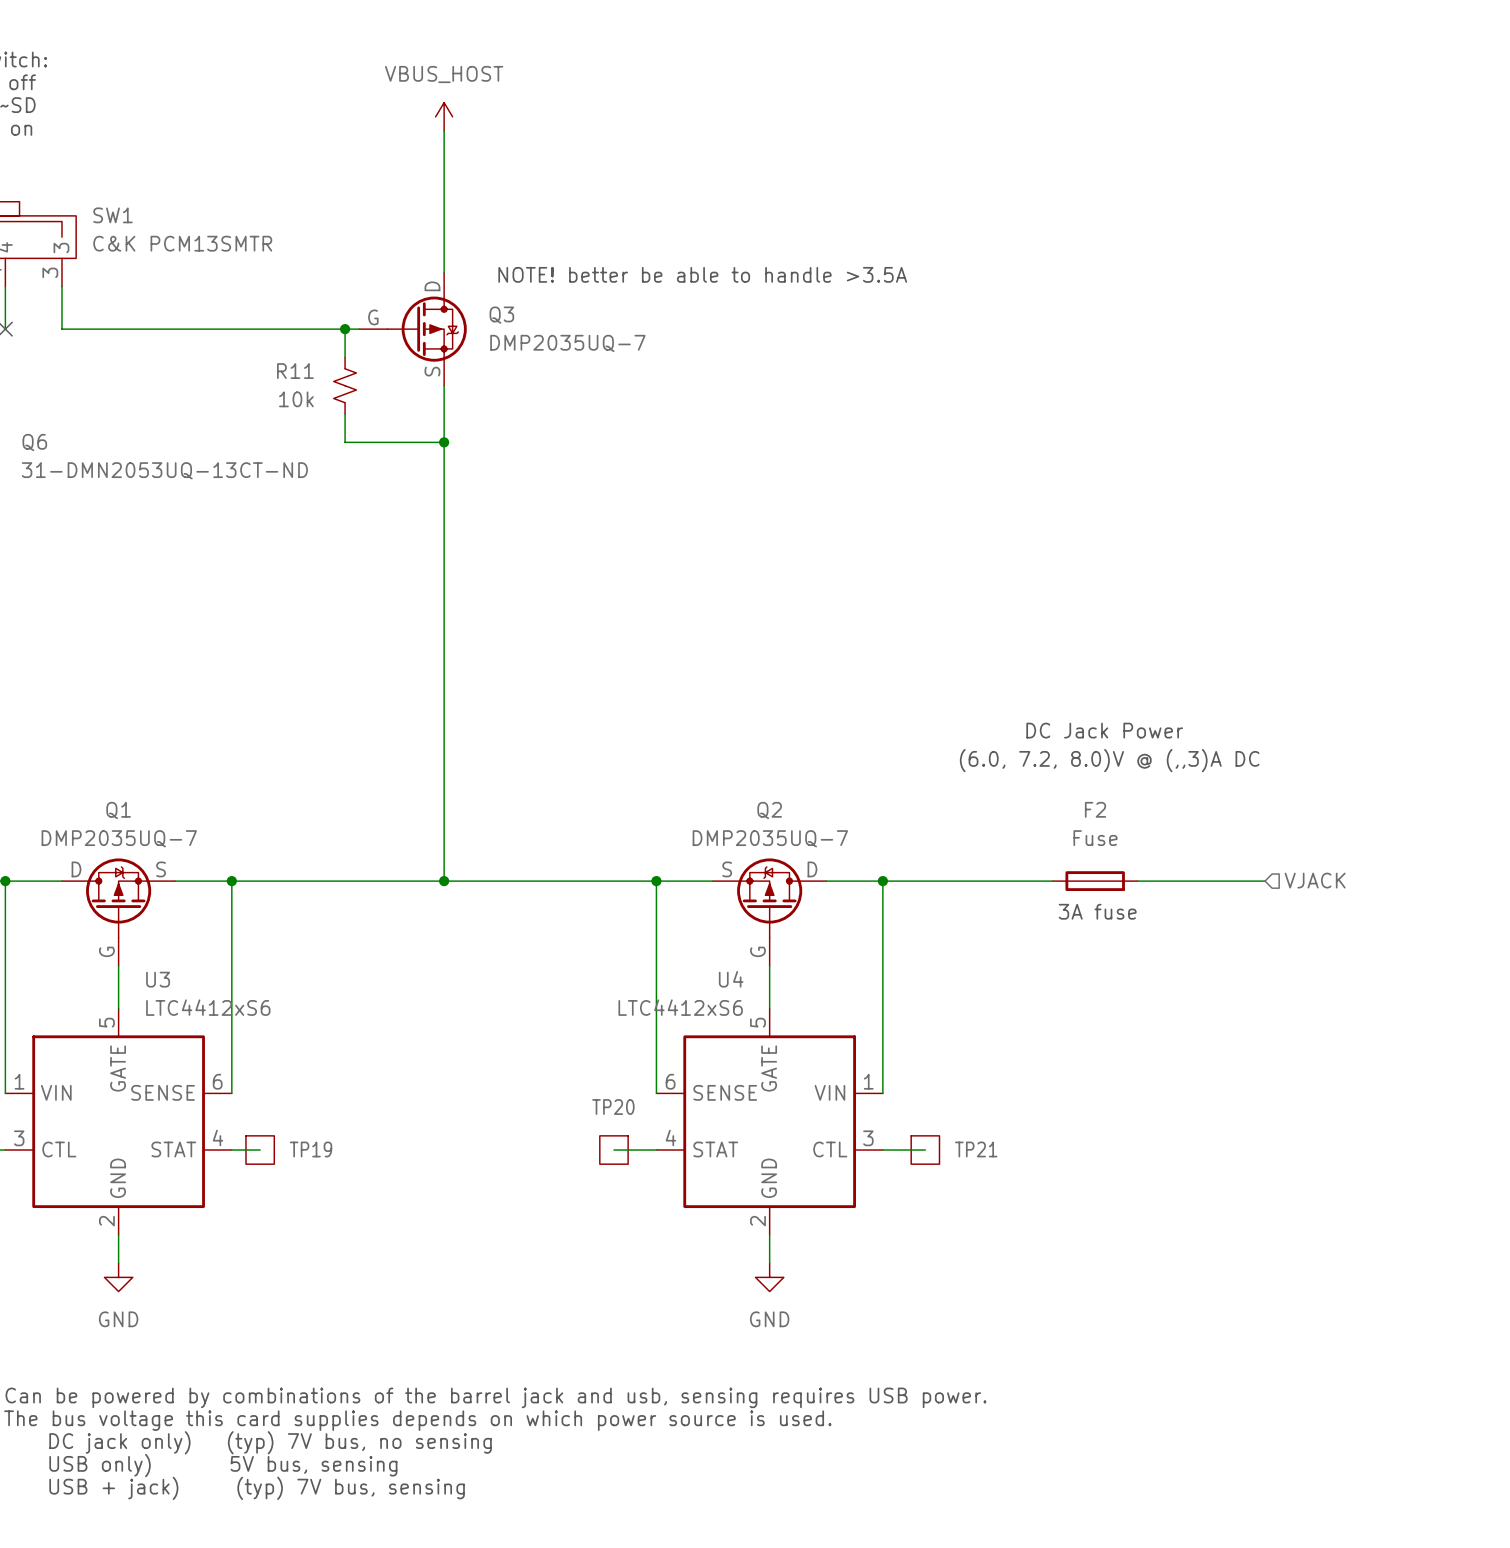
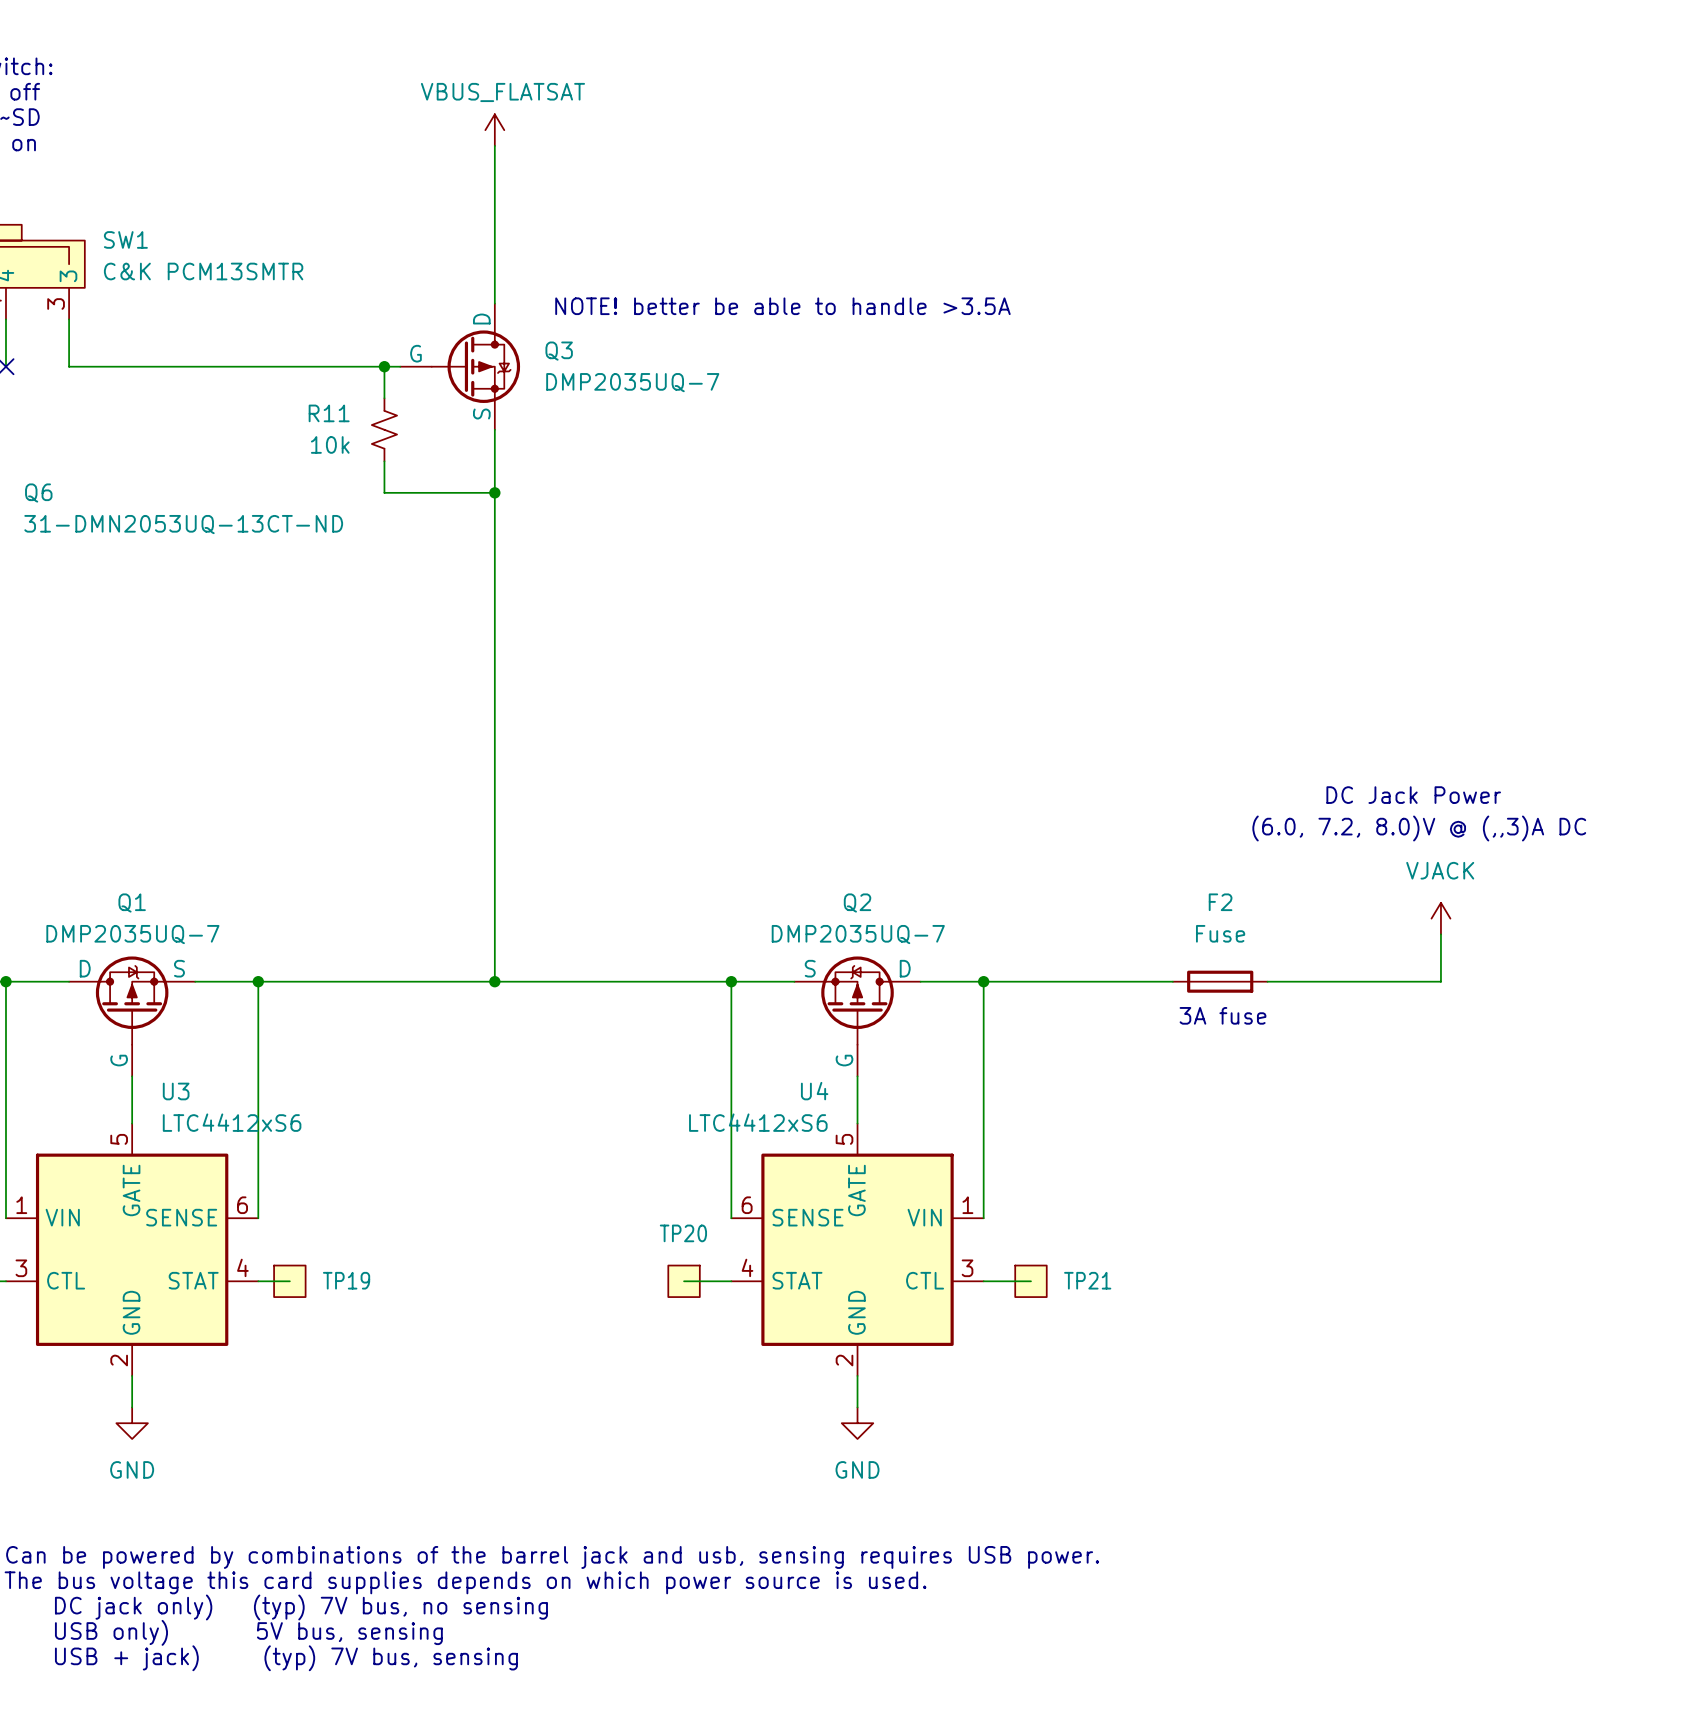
power symbol: VBUS_HOST (444, 116) -> VBUS_FLATSAT (494, 130)
text position: DC Jack Power (1104, 730) -> DC Jack Power (1413, 795)
text position: (6.0, 7.2, 8.0)V @ (,,3)A DC (1109, 760) -> (6.0, 7.2, 8.0)V @ (,,3)A DC (1419, 828)
power symbol: none -> VJACK (1440, 918)
wire: none -> (1440, 934) (1440, 981) (1409, 981)
hierarchical label: VJACK (1315, 880) -> none

